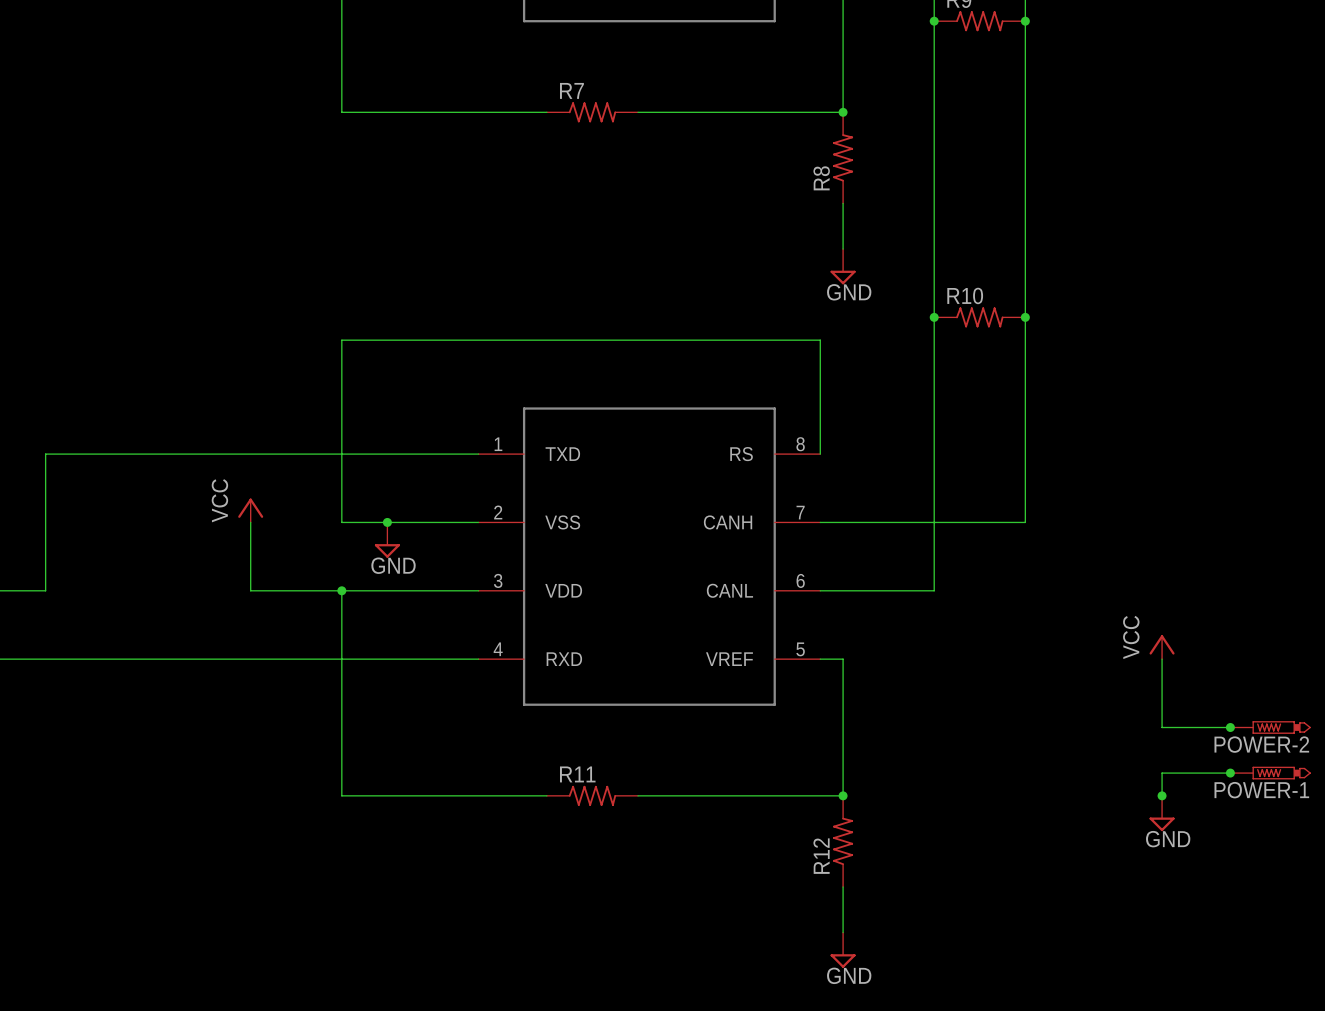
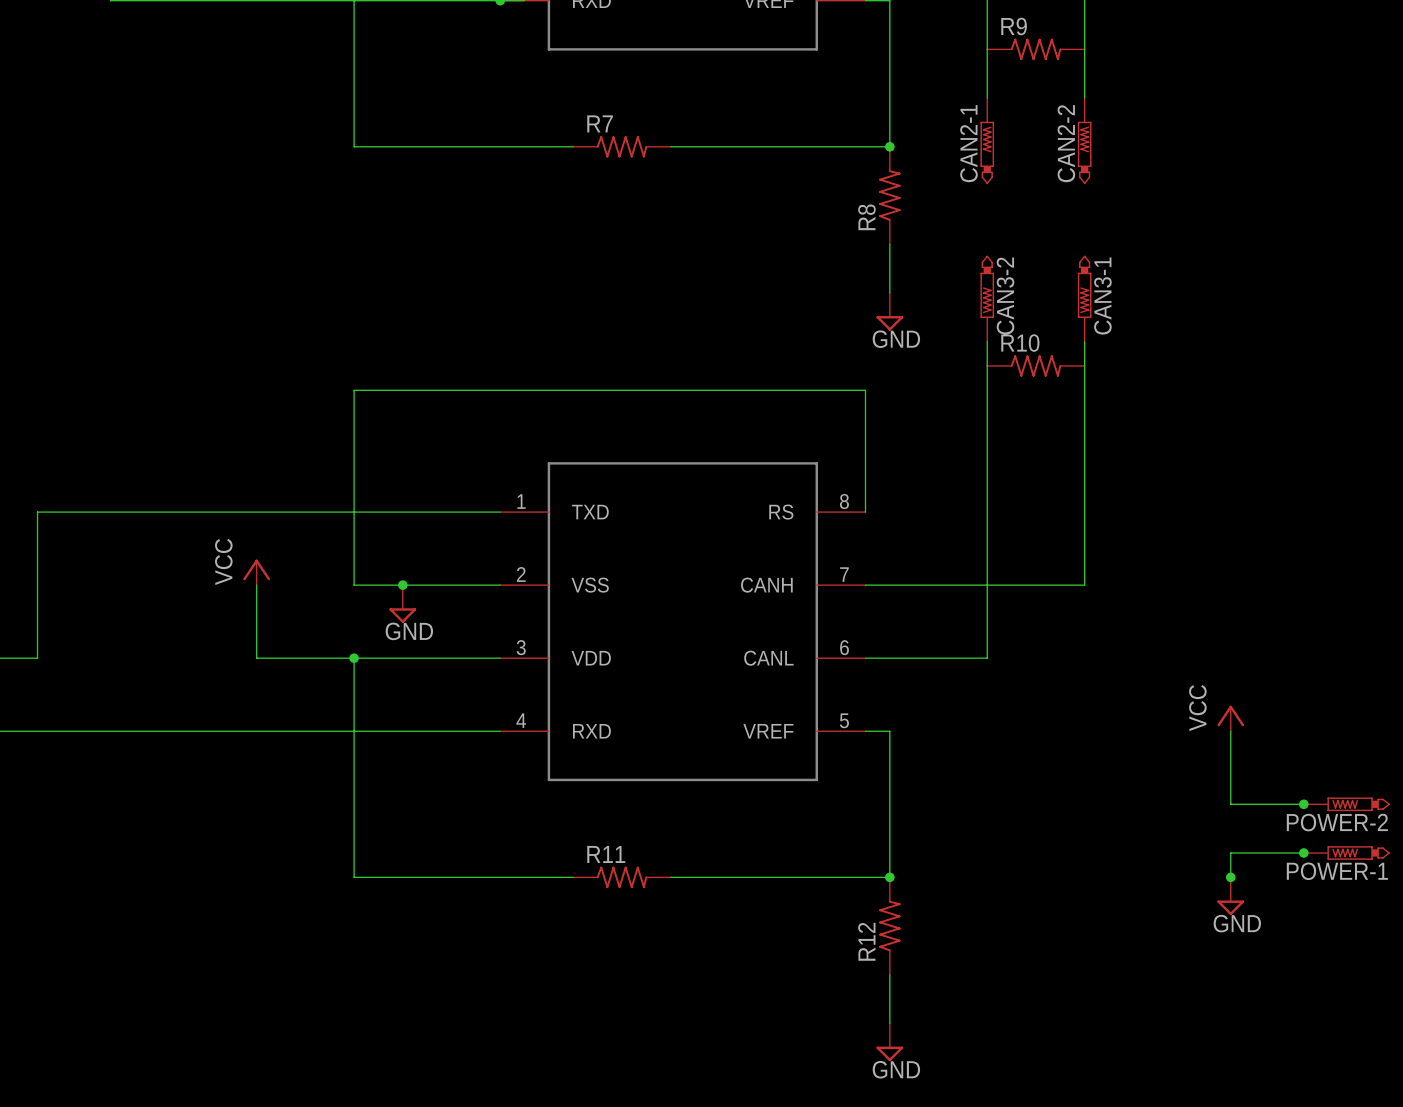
junction: (934, 21) -> none
junction: (1025, 21) -> none
wire: (934, 66) (934, 294) -> none
wire: (1025, 66) (1025, 294) -> none
CAN2-1: none -> (987, 141)
CAN2-2: none -> (1084, 141)
CAN3-2: none -> (987, 298)
CAN3-1: none -> (1084, 298)
junction: (934, 317) -> none
junction: (1025, 317) -> none

